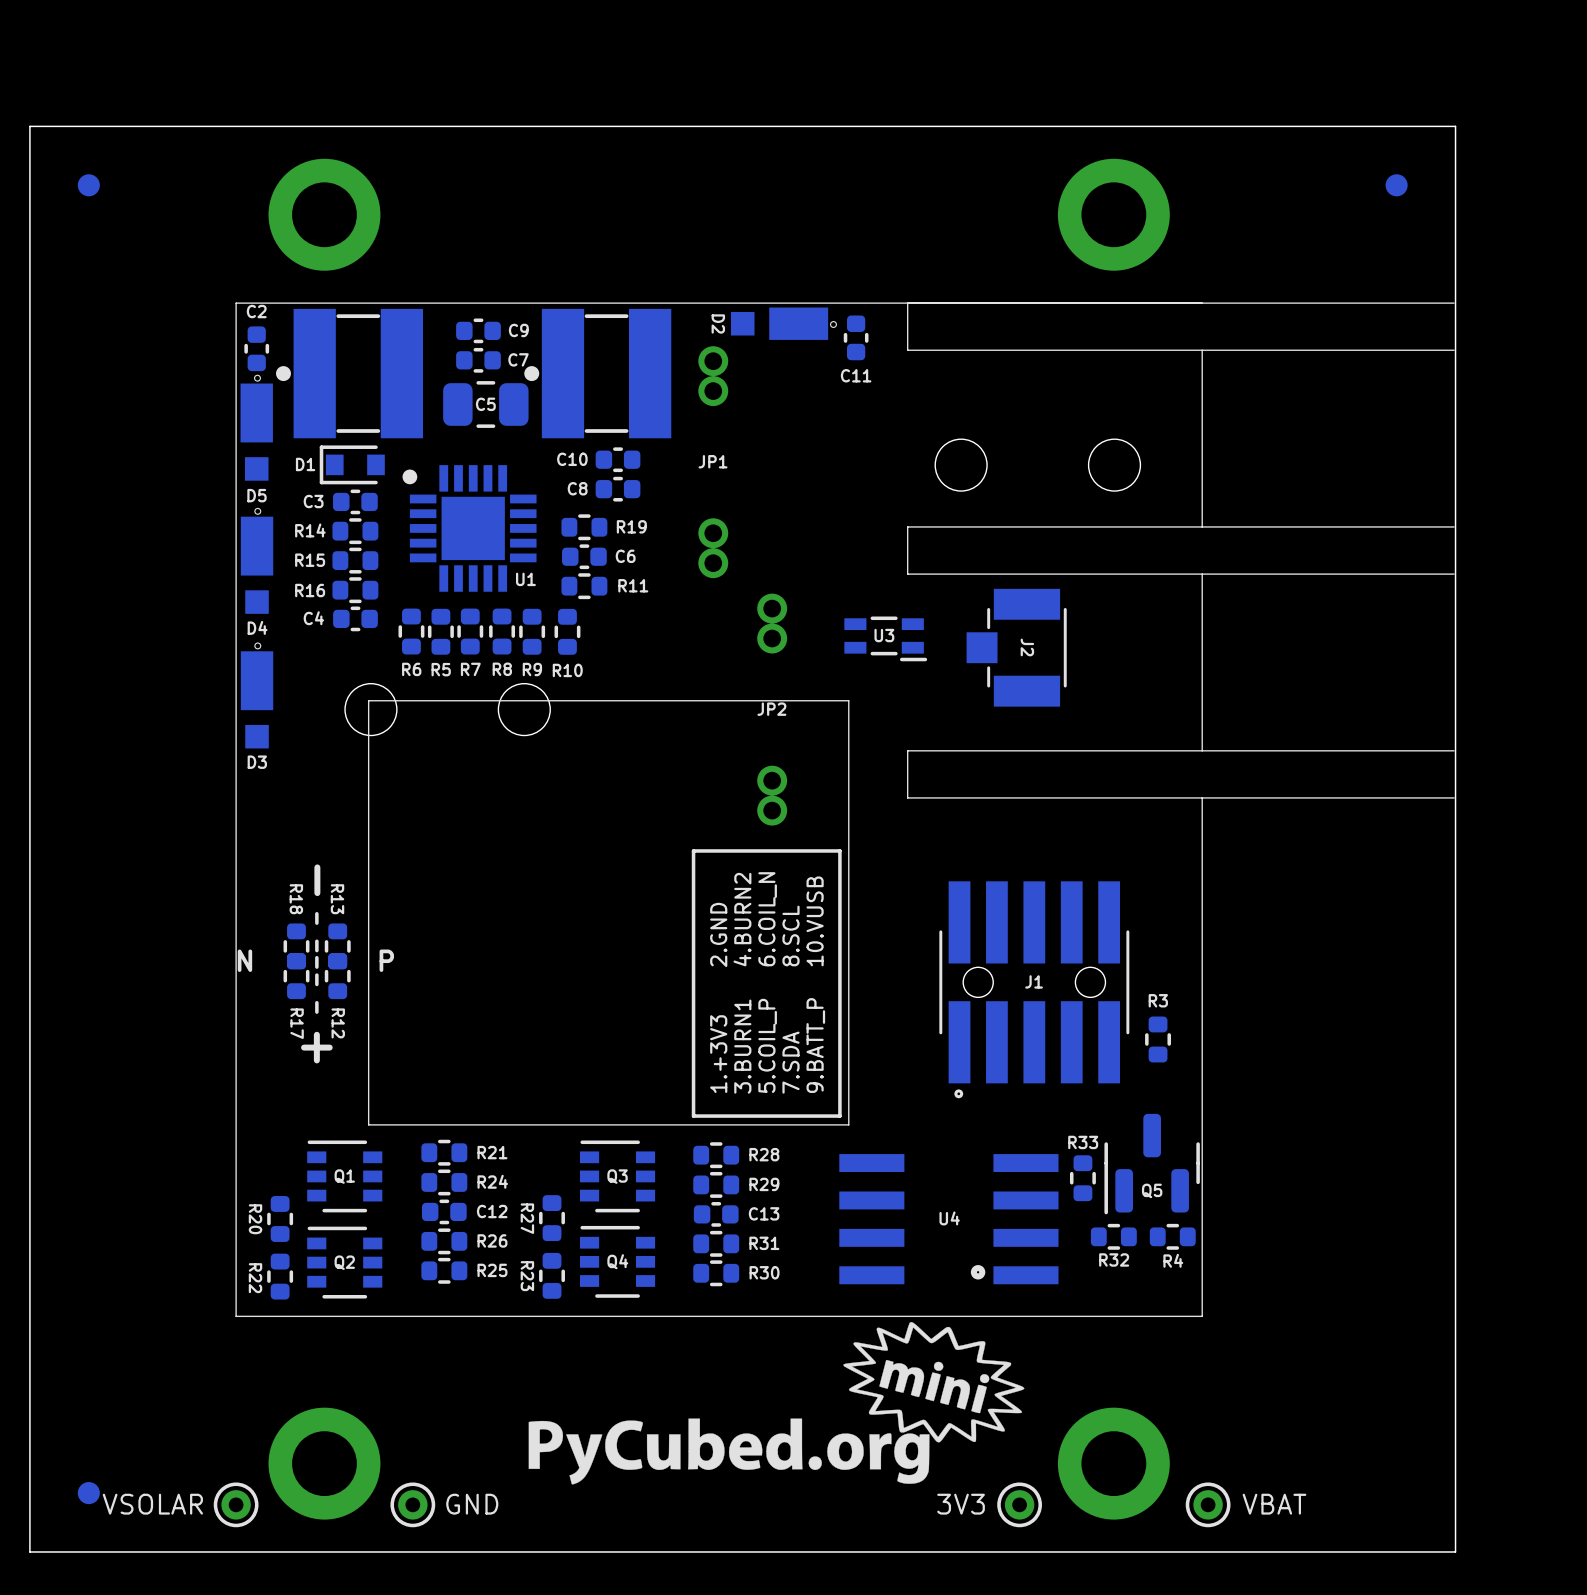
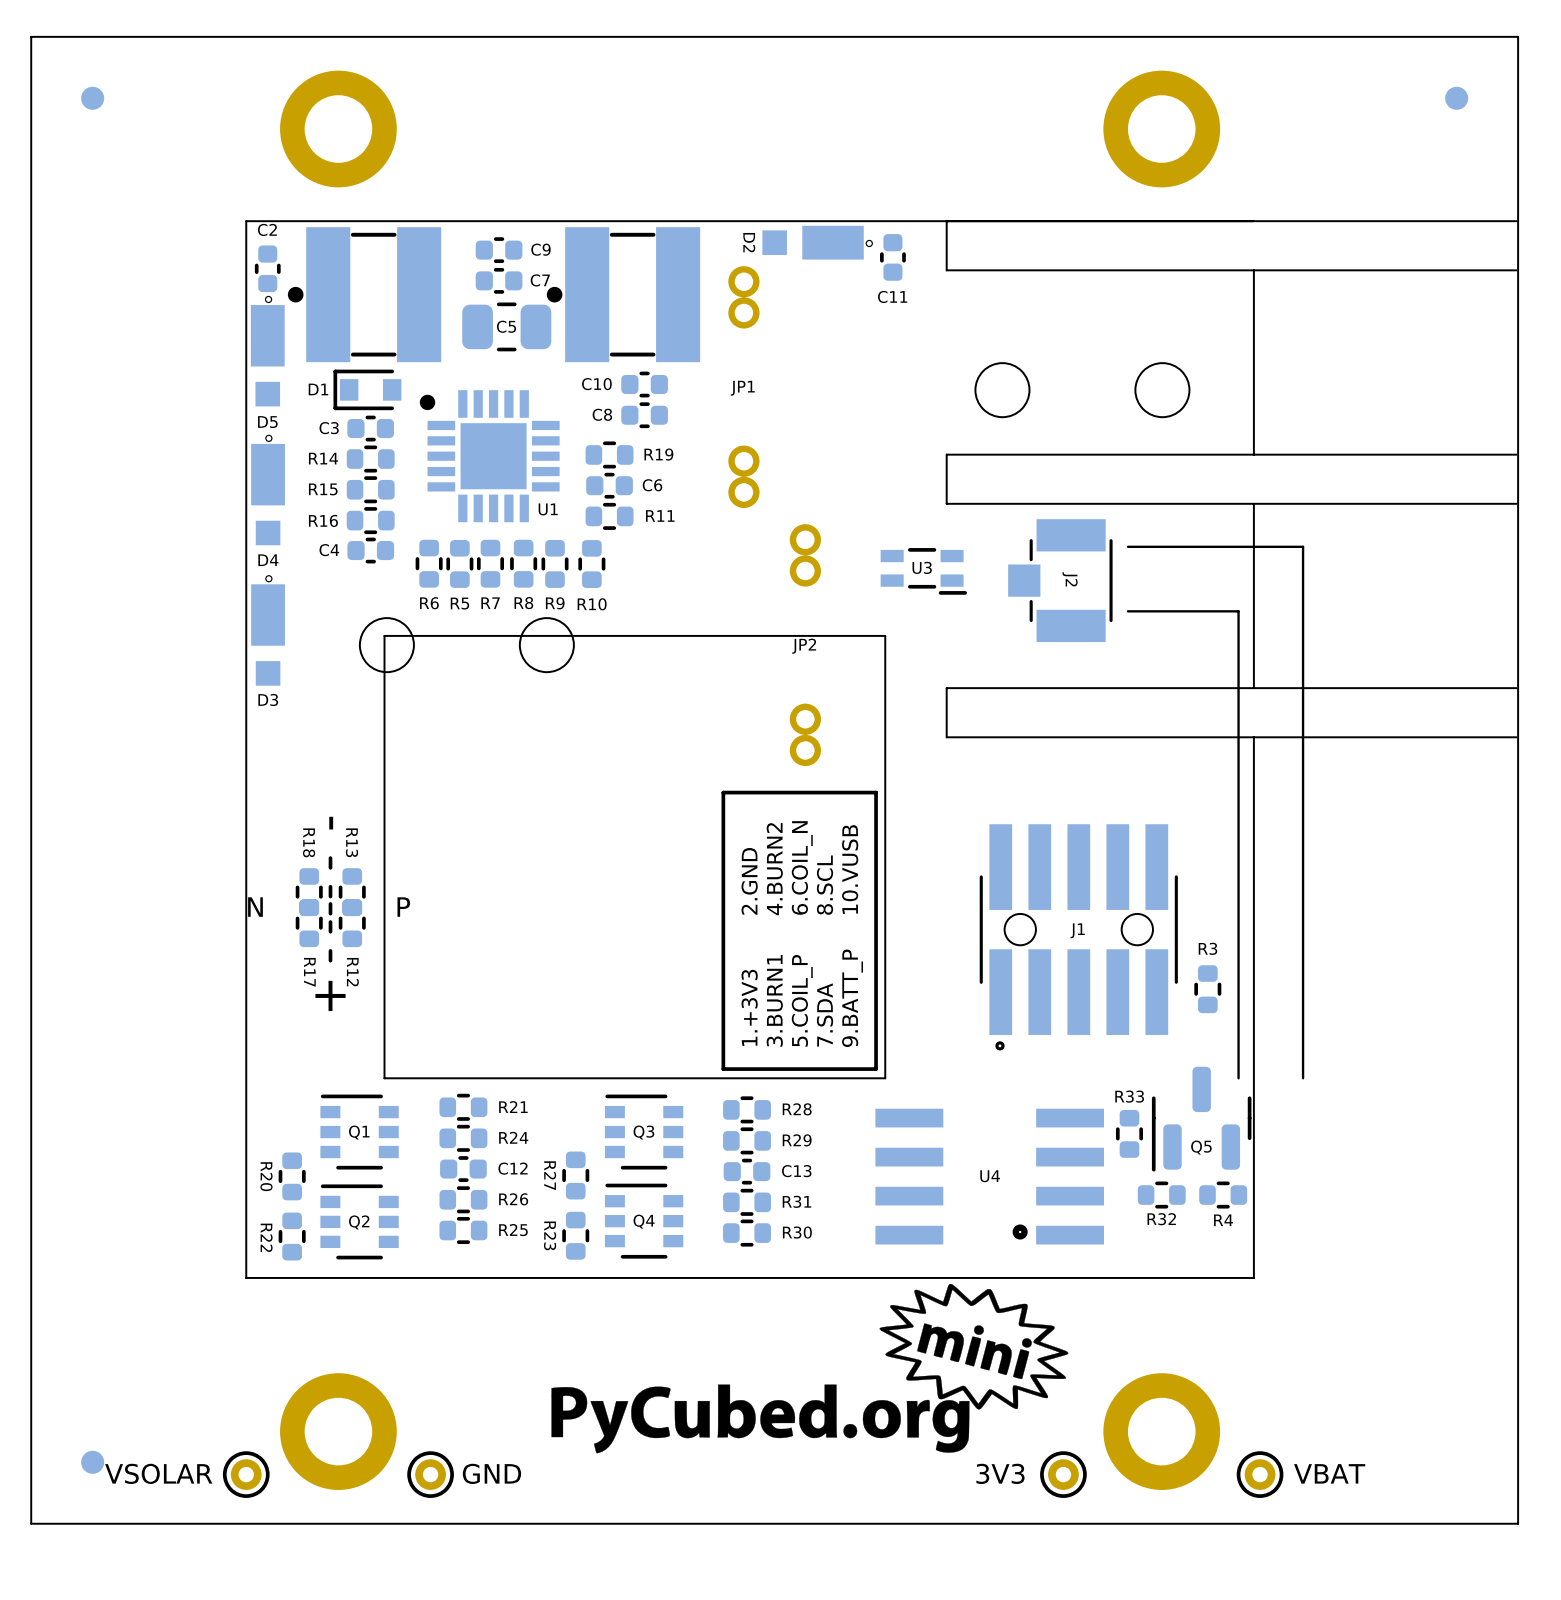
line: none -> (1127, 546) (1303, 546) (1303, 1078)
line: none -> (1127, 611) (1238, 611) (1238, 1078)

